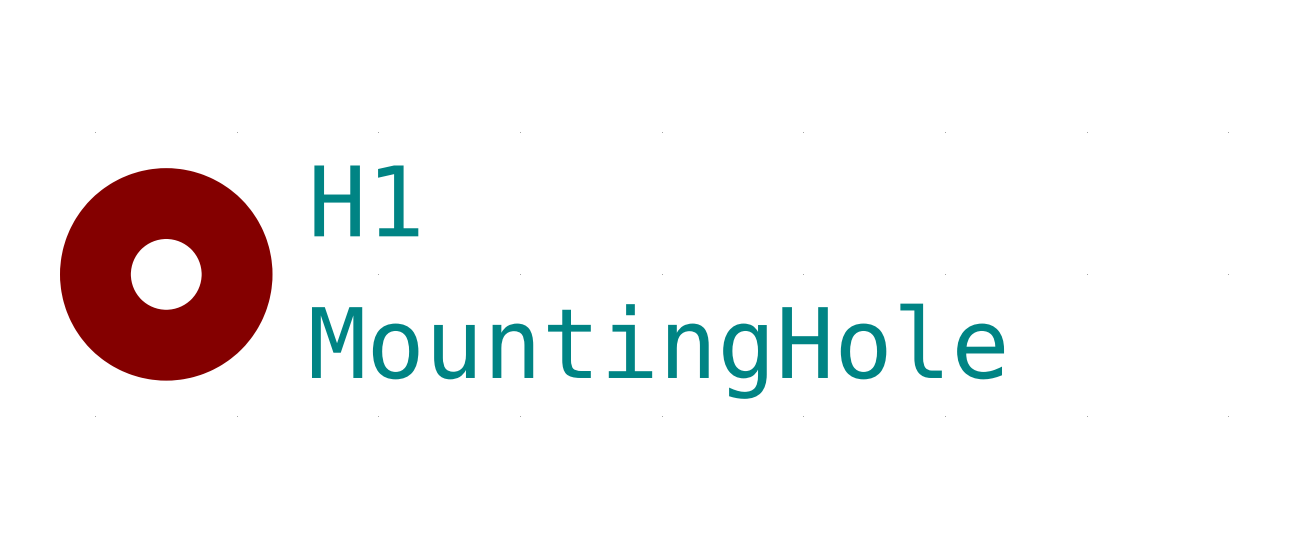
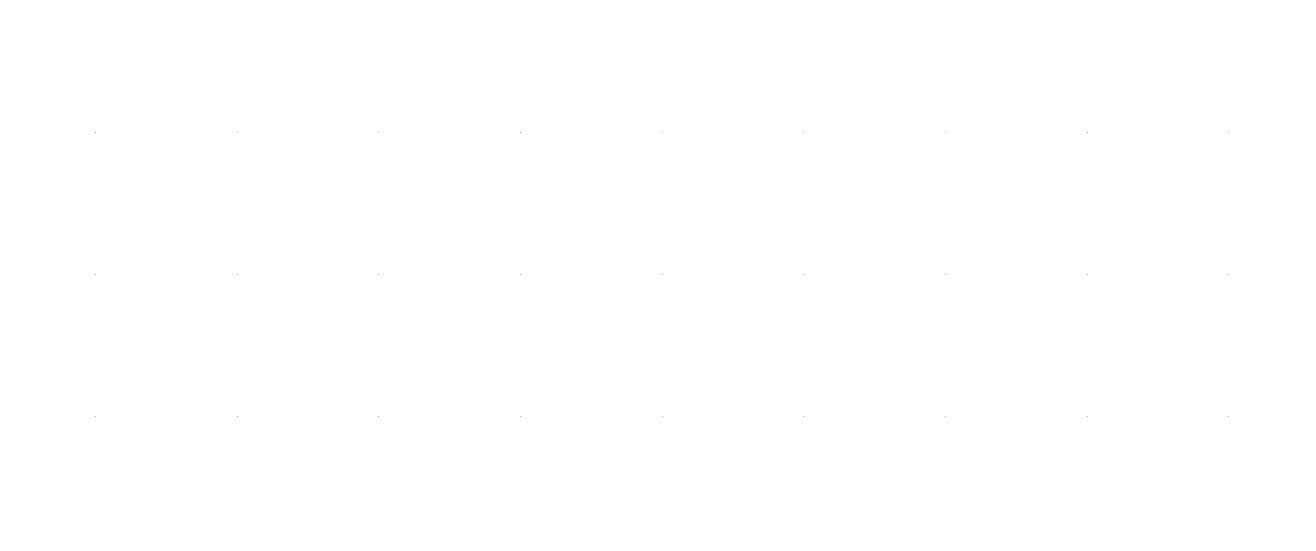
H1: MountingHole (166, 274) -> none

